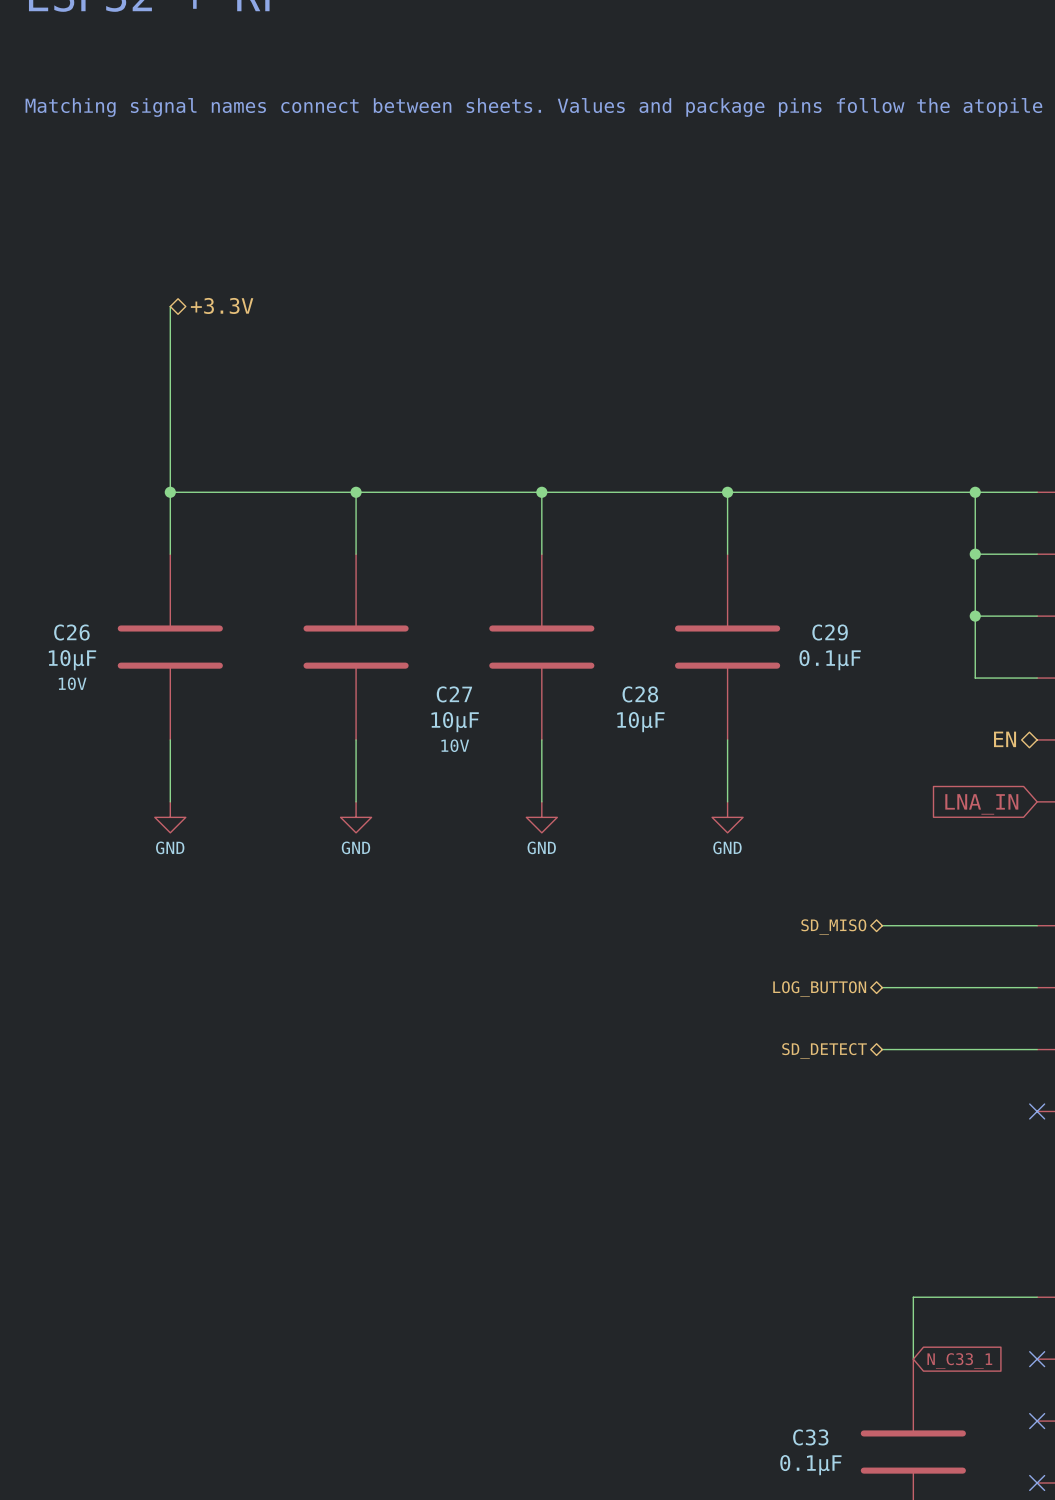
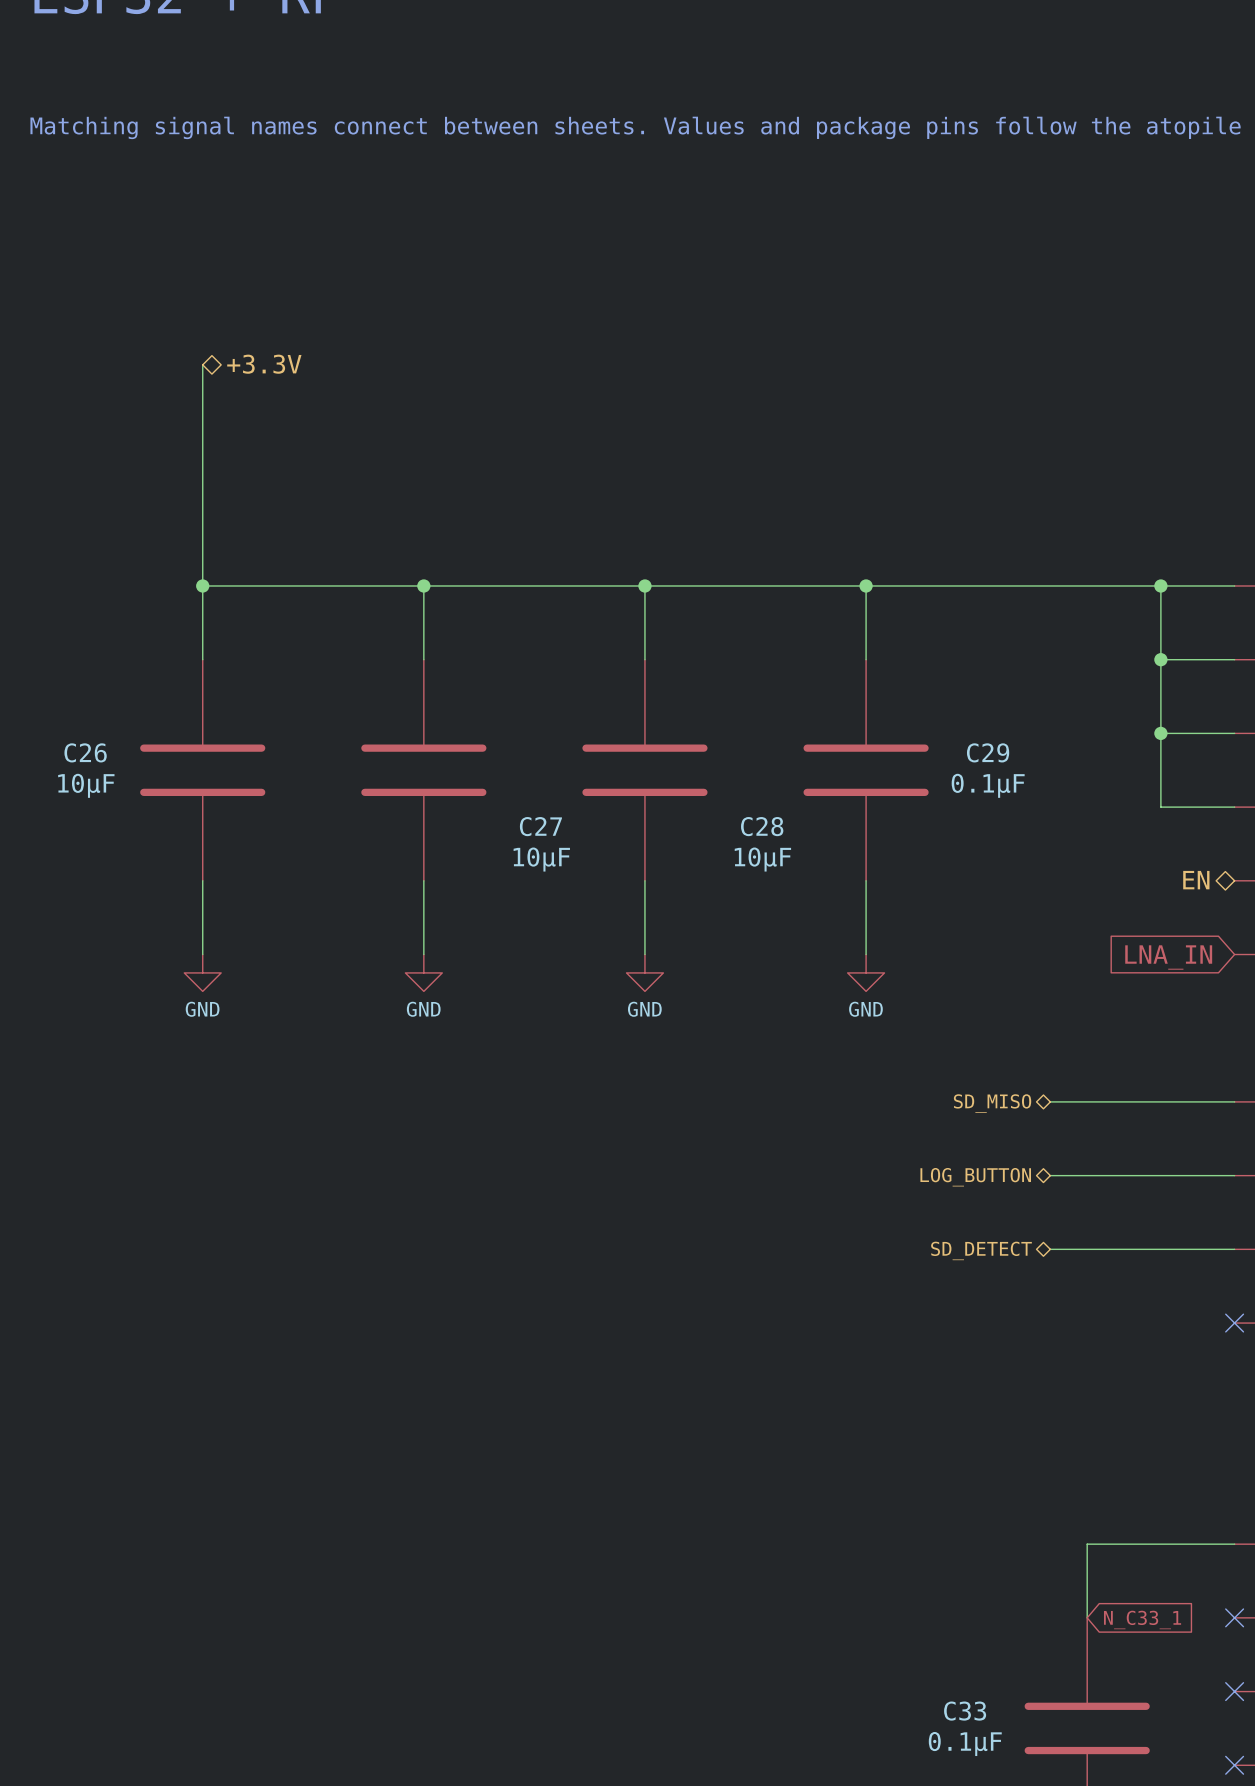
C26 text: 10V (72, 683) -> none
C27 text: 10V (455, 745) -> none

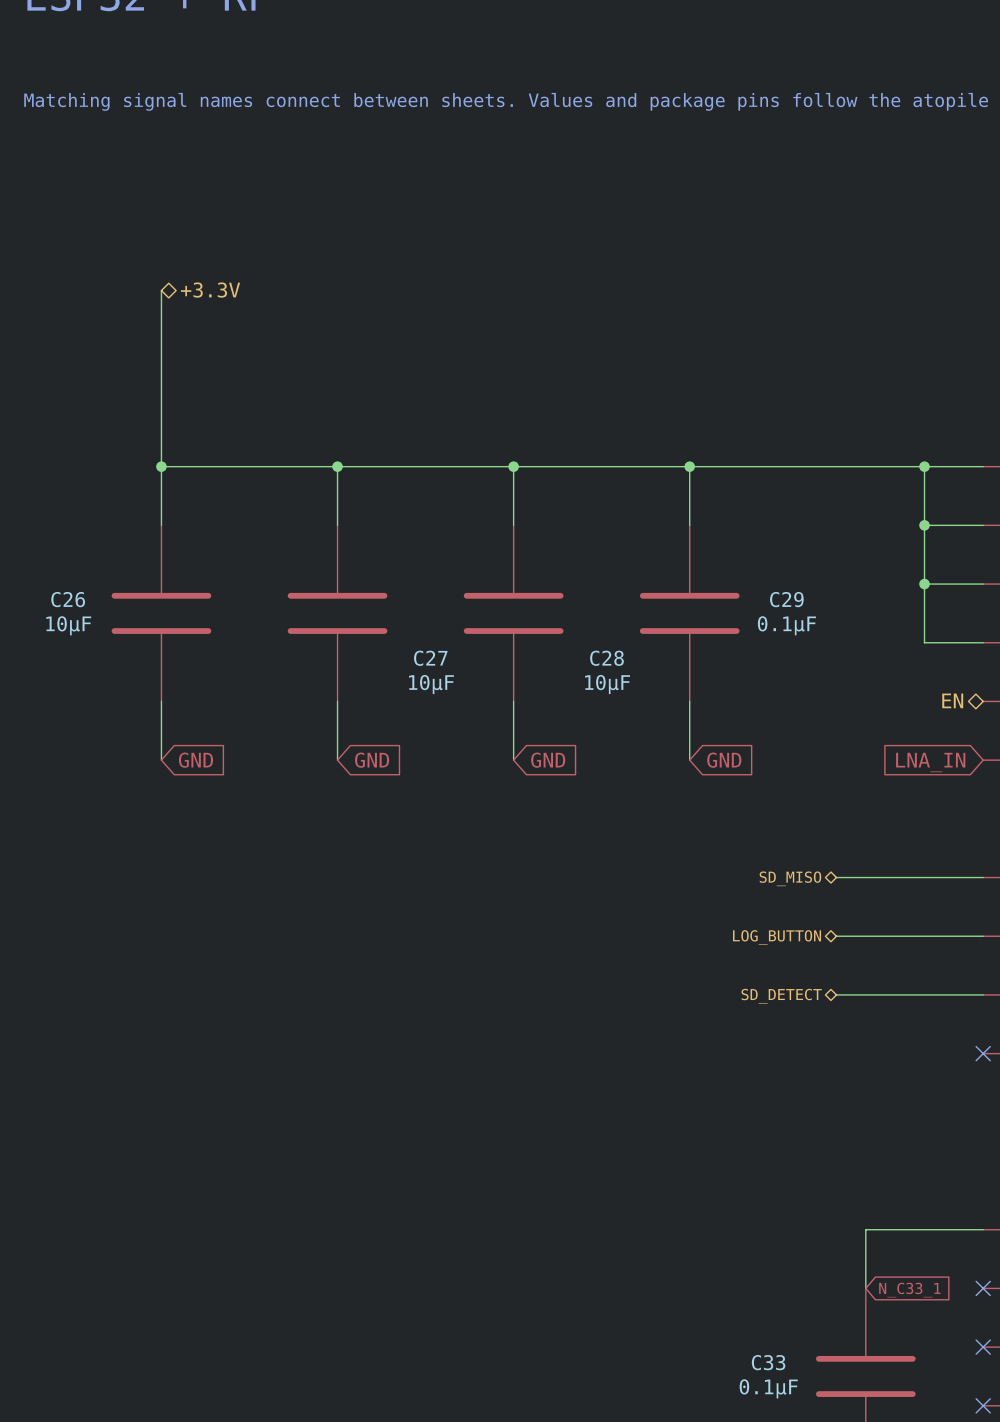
global label: none -> GND (196, 760)
global label: none -> GND (372, 760)
global label: none -> GND (548, 760)
global label: none -> GND (724, 760)
power symbol: GND (202, 972) -> none
power symbol: GND (423, 972) -> none
power symbol: GND (644, 972) -> none
power symbol: GND (866, 972) -> none

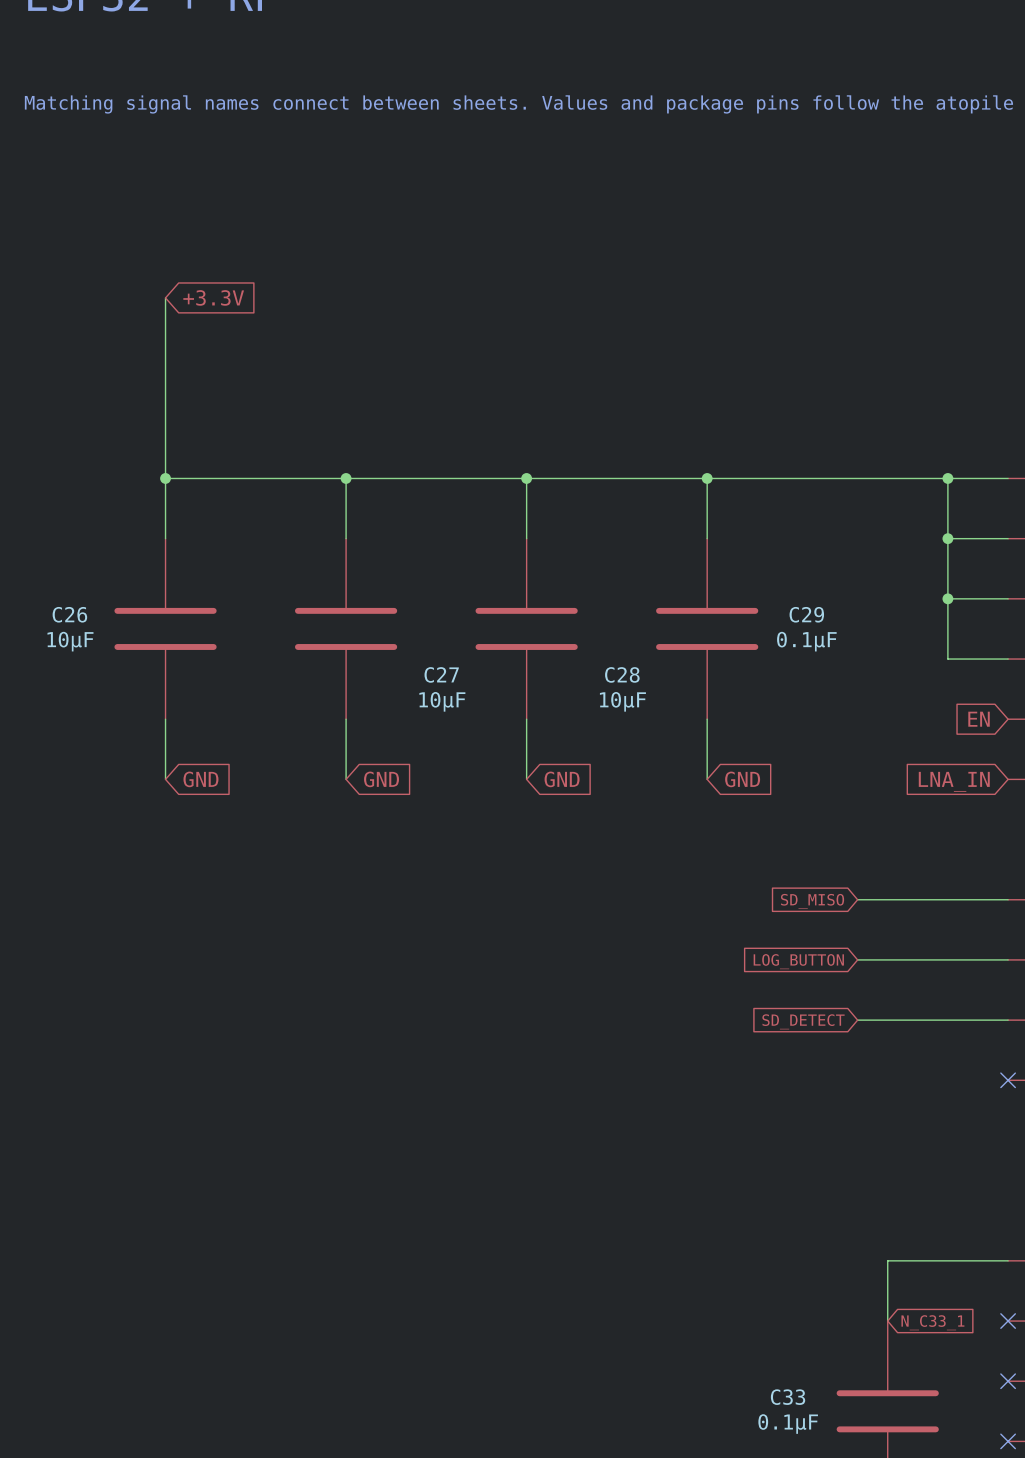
global label: none -> +3.3V (213, 297)
hierarchical label: +3.3V (210, 290) -> none
hierarchical label: EN (952, 700) -> none
global label: none -> EN (979, 719)
hierarchical label: SD_MISO (790, 878) -> none
global label: none -> SD_MISO (812, 901)
hierarchical label: LOG_BUTTON (777, 937) -> none
global label: none -> LOG_BUTTON (798, 961)
hierarchical label: SD_DETECT (781, 996) -> none
global label: none -> SD_DETECT (803, 1021)

